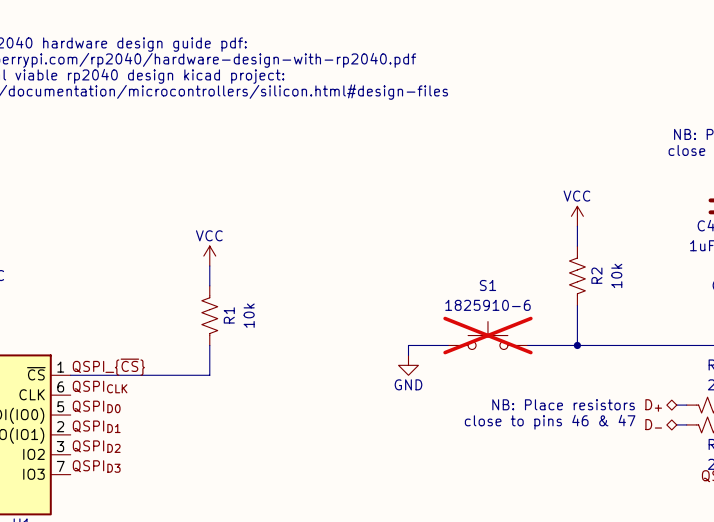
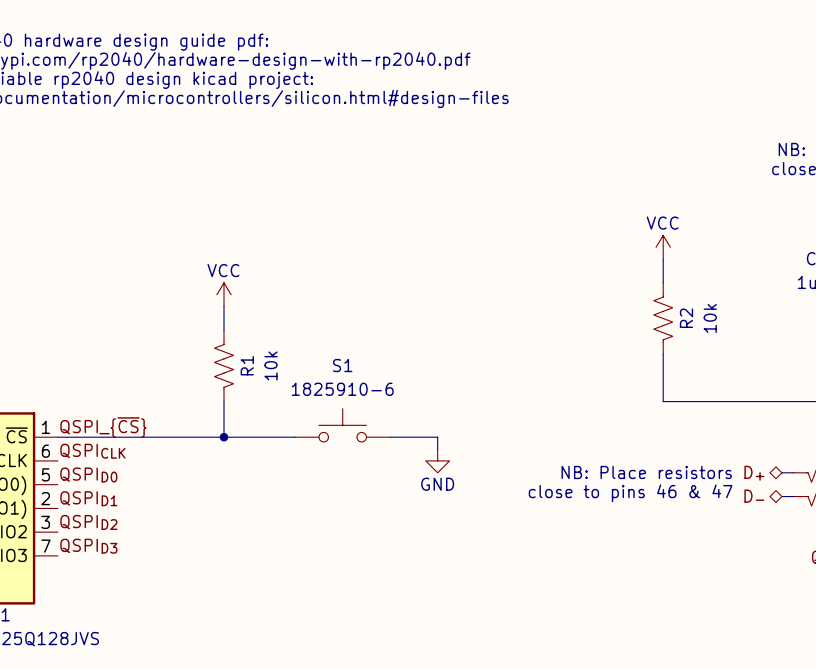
S1 position: (487, 335) -> (342, 425)
S1 do-not-place cross: (487, 335) -> none
wire: (448, 345) (408, 345) (408, 355) -> none
wire: (527, 345) (577, 345) -> none
junction: (577, 345) -> none
power symbol position: GND (408, 365) -> GND (437, 460)
wire: none -> (223, 437) (295, 437)
junction: none -> (223, 437)
wire: none -> (390, 437) (437, 437) (437, 449)

